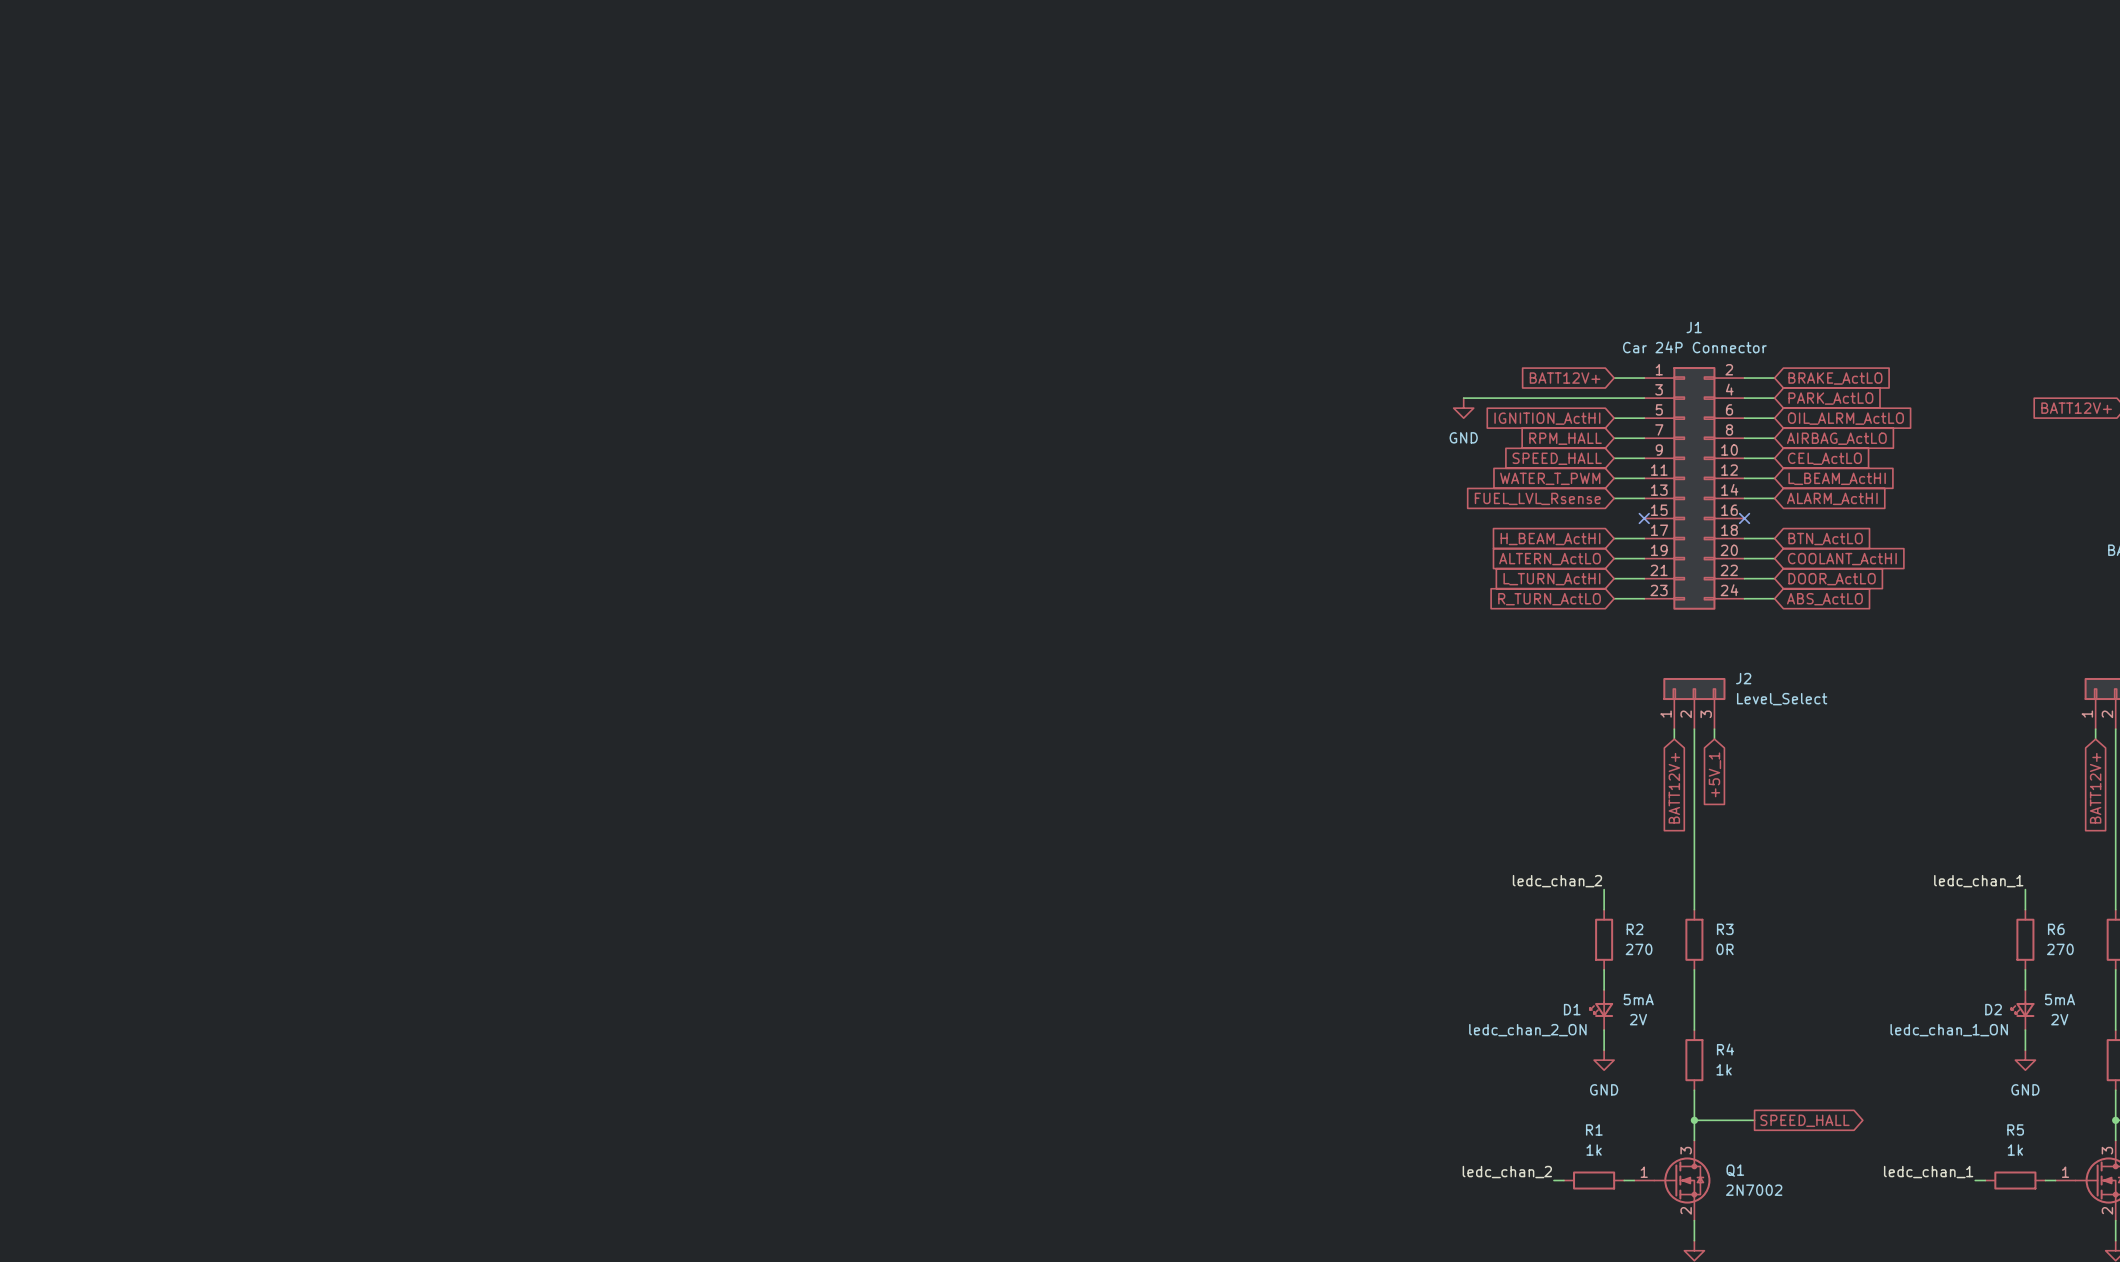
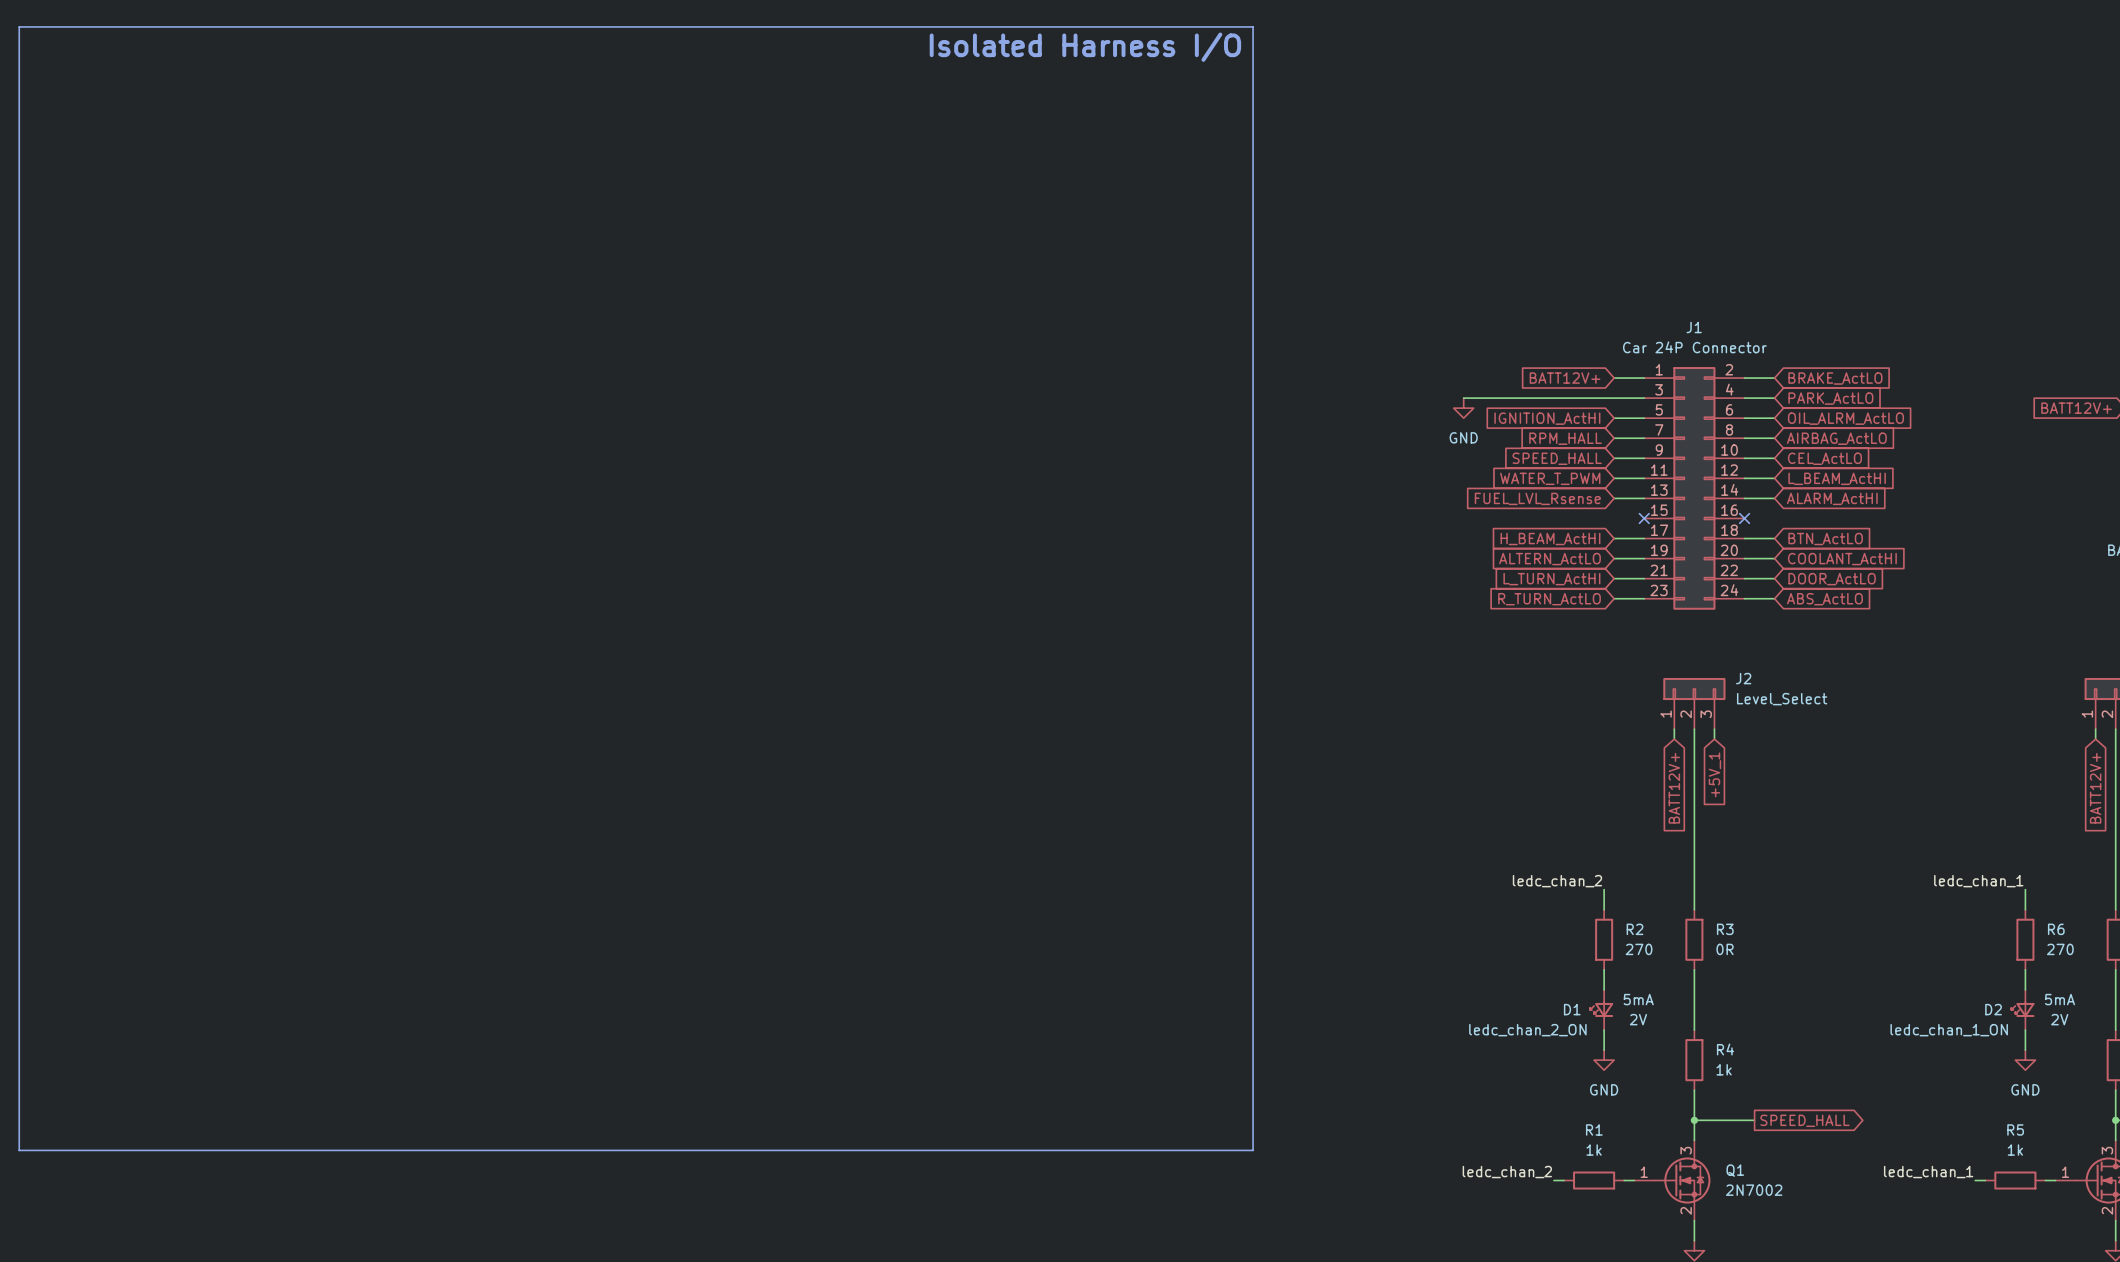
line: none -> (19, 26) (1253, 26) (1253, 1150) (19, 1150) (19, 26)
text: none -> Isolated Harness I/O (1085, 47)

